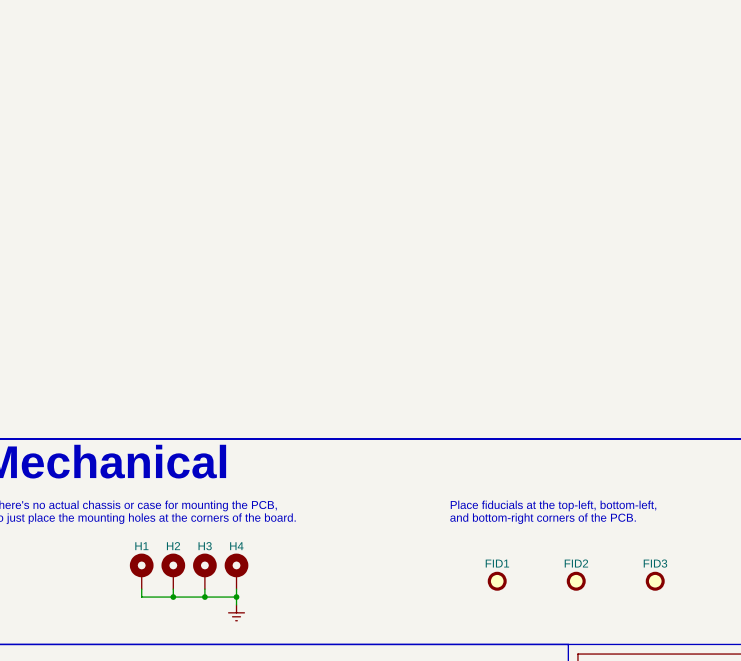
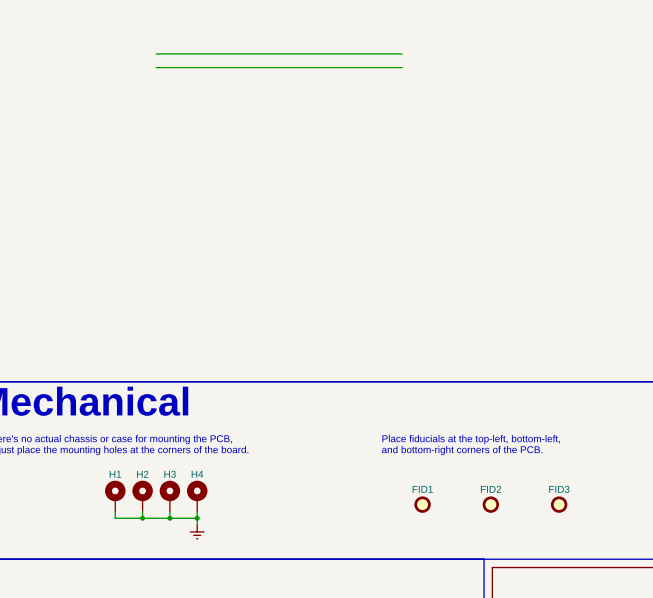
wire: none -> (156, 53) (402, 53)
wire: none -> (156, 67) (402, 67)

